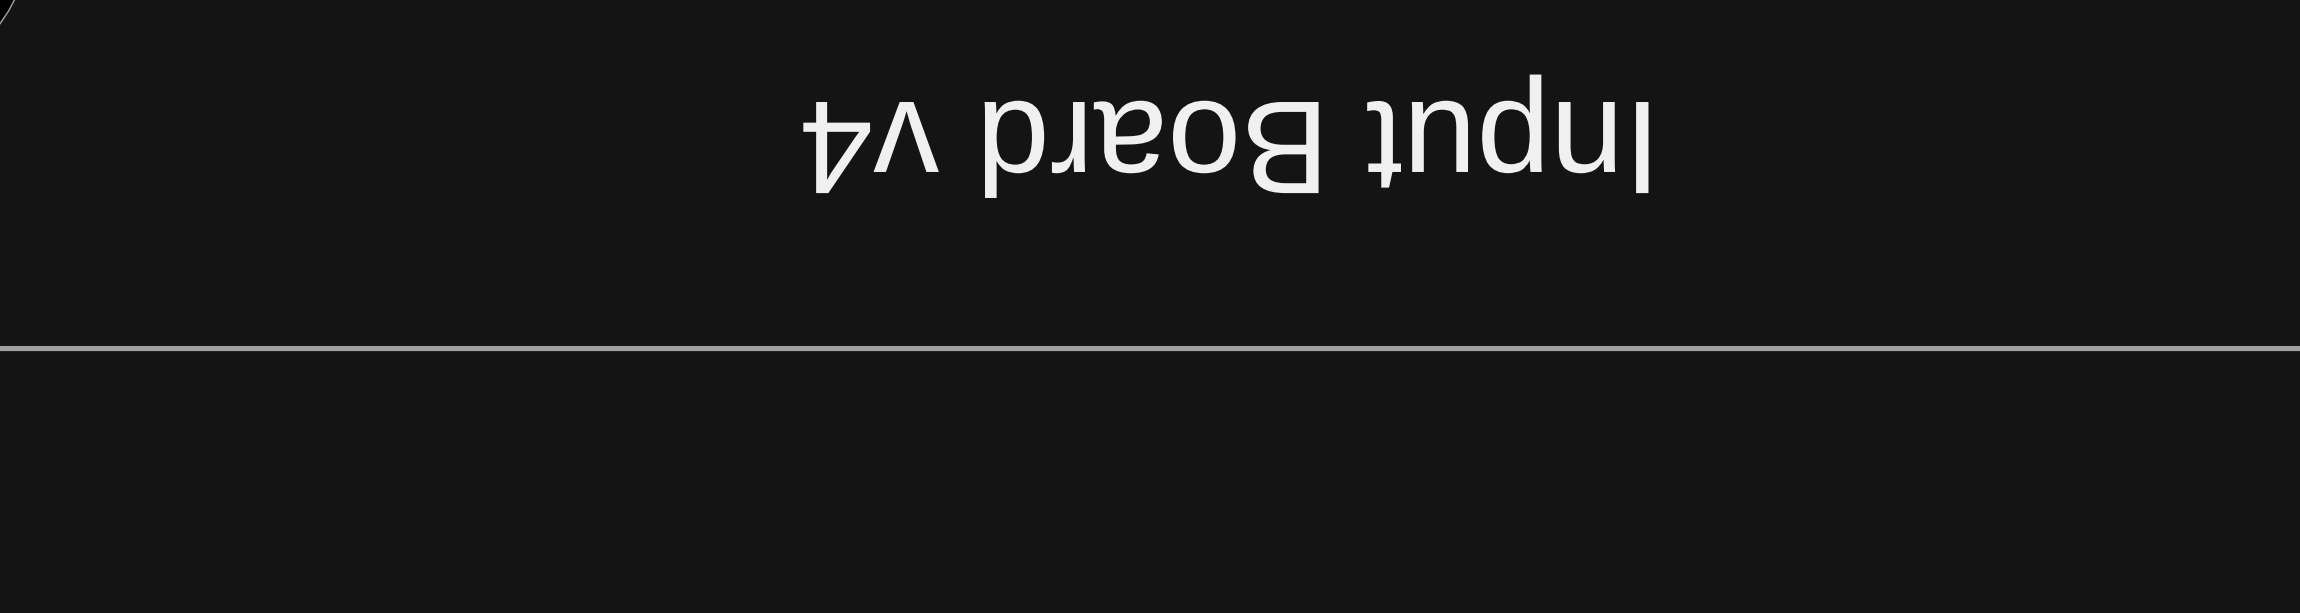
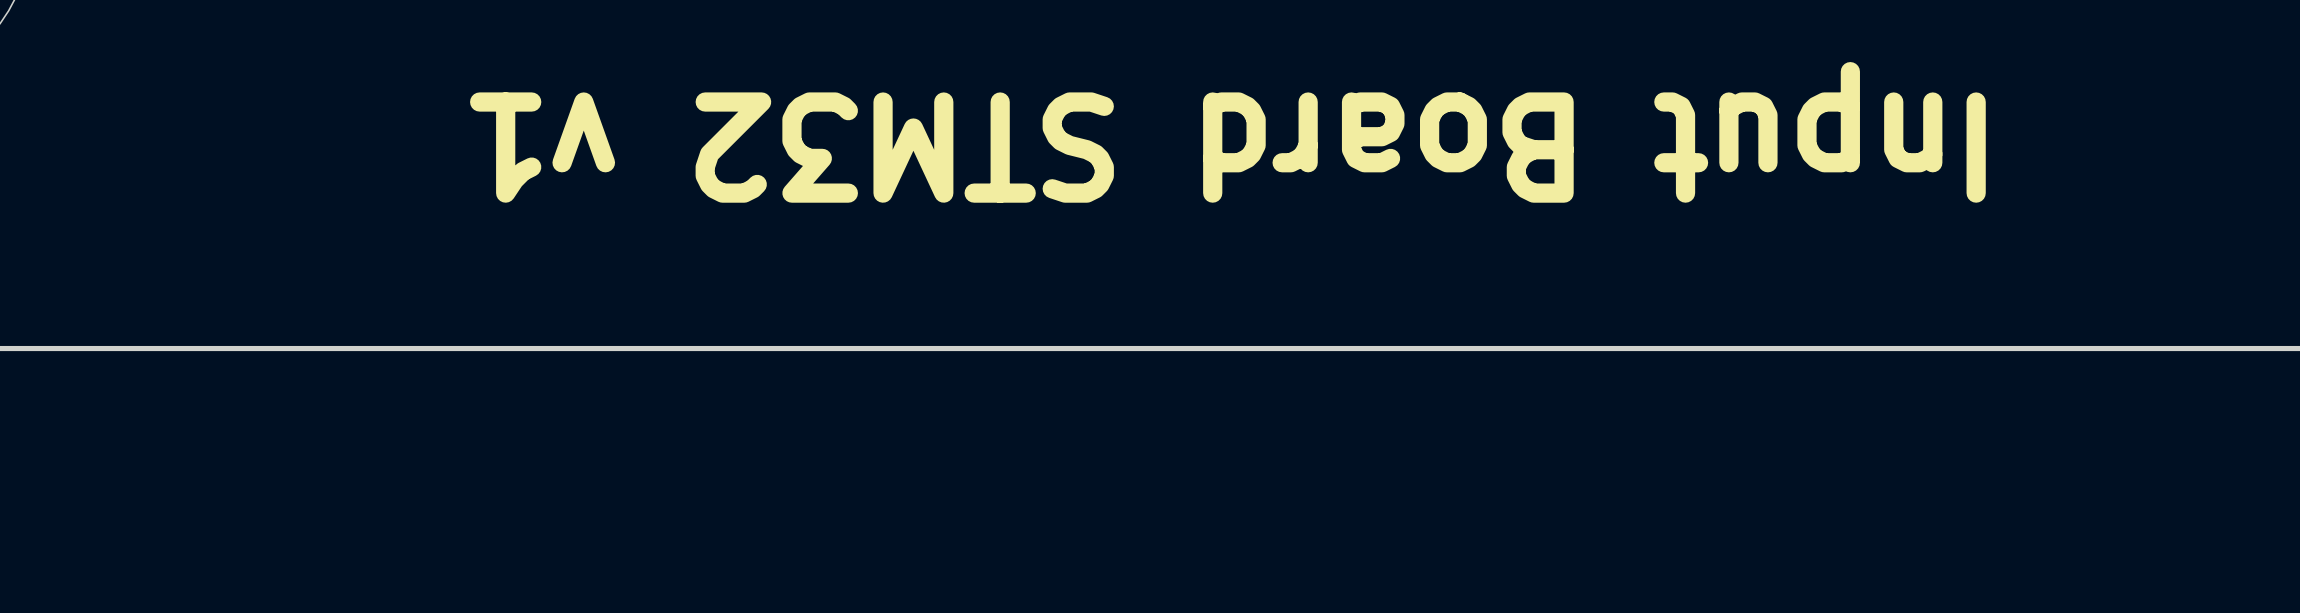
text: Input Board v4 (1225, 136) -> Input Board STM32 v1 (1227, 132)

